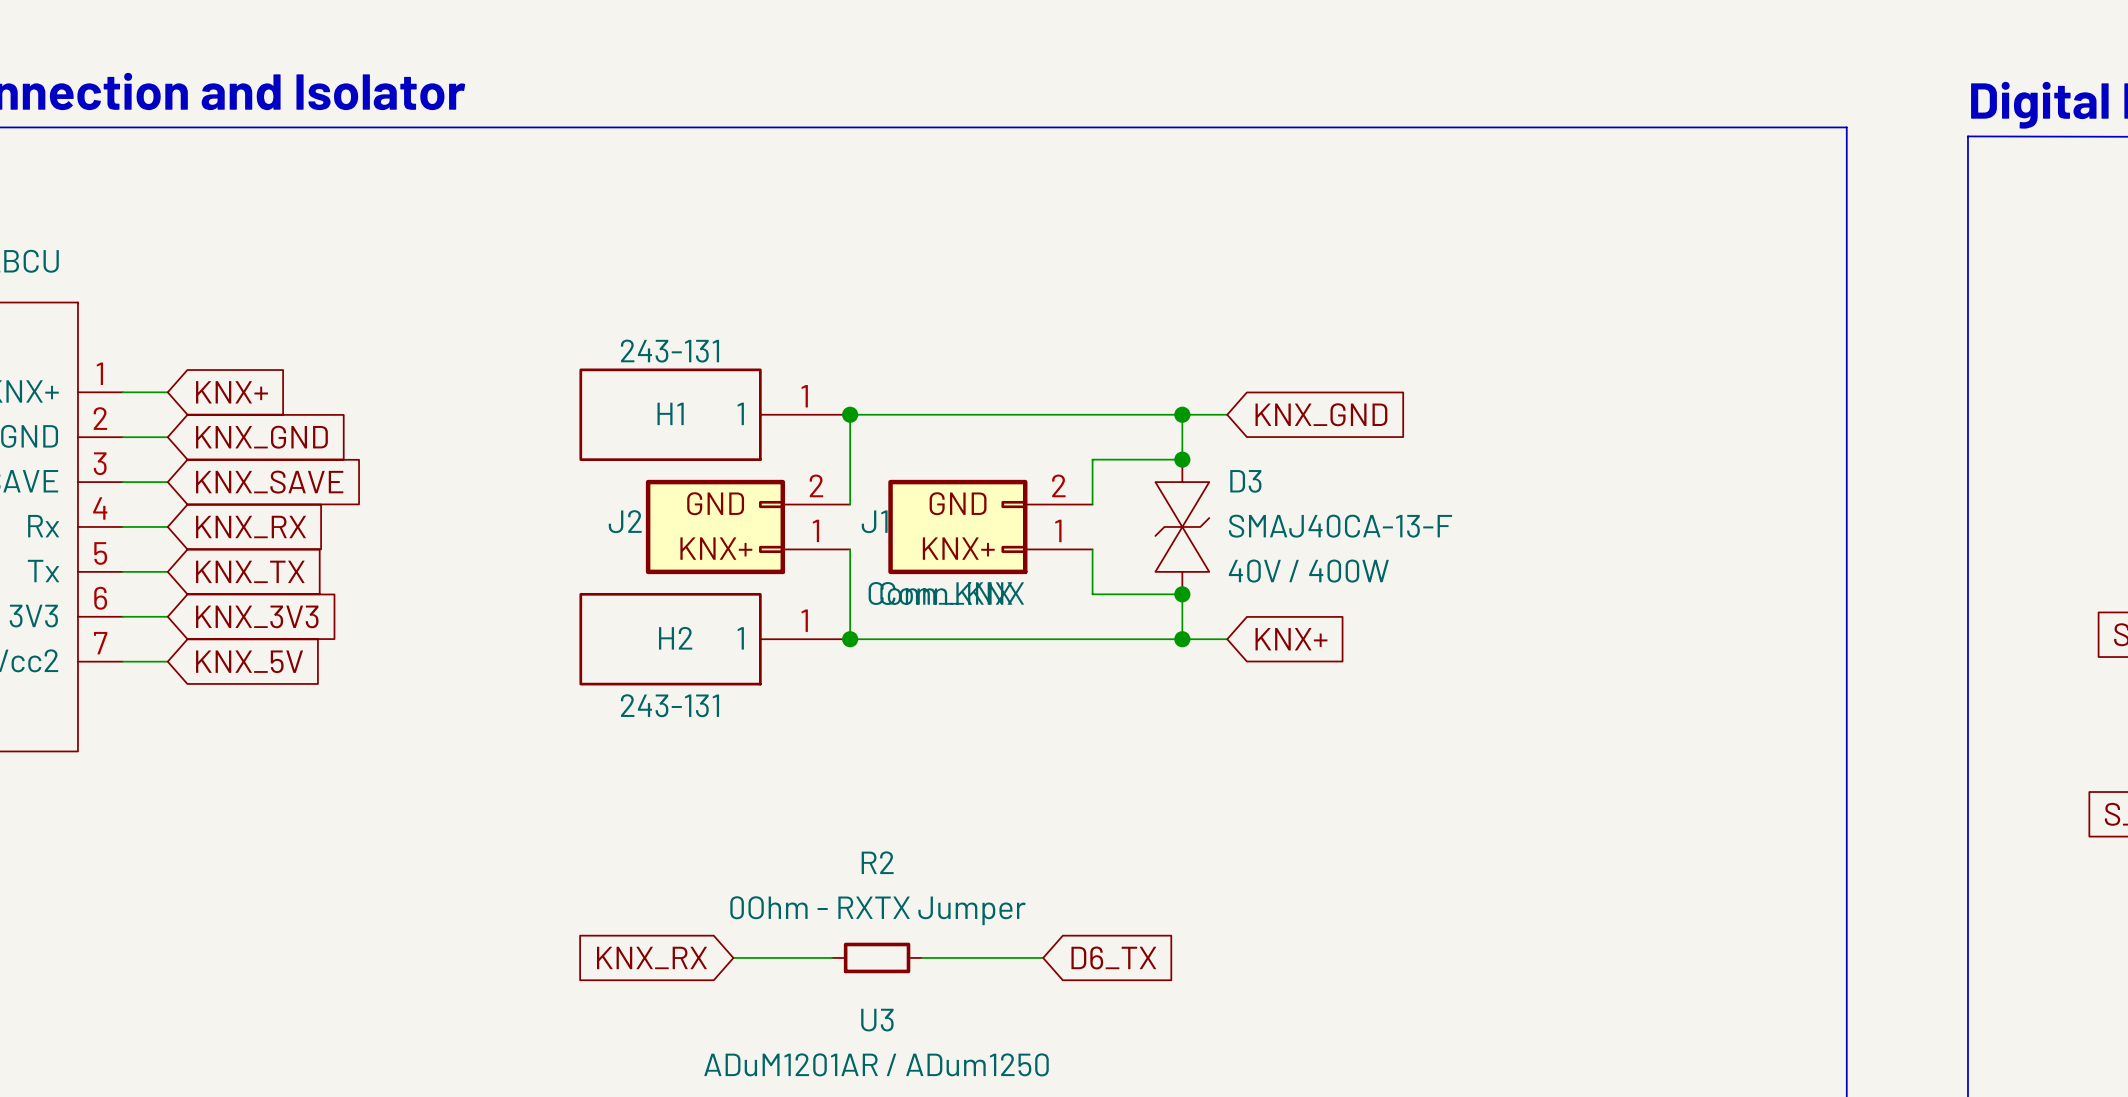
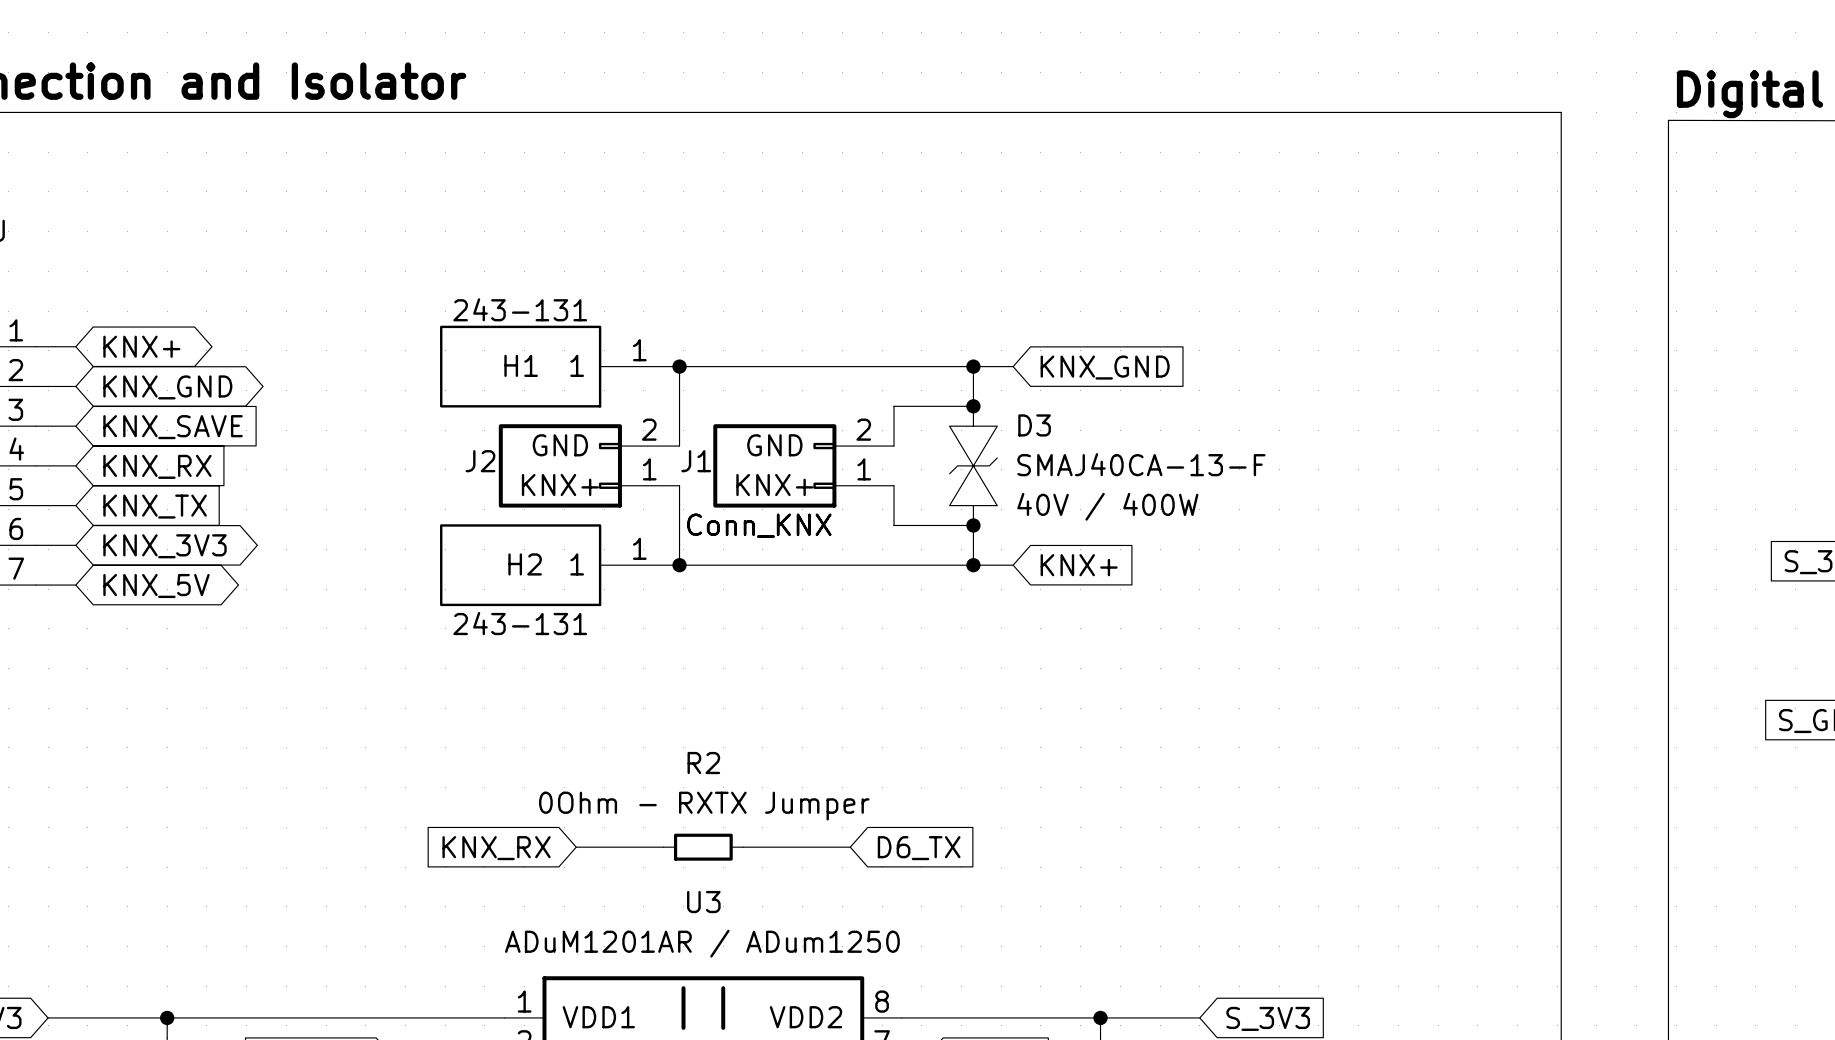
global label shape: input (231, 392) -> bidirectional (141, 346)
global label shape: input (261, 437) -> bidirectional (167, 387)
global label shape: input (257, 616) -> bidirectional (165, 546)
global label shape: input (249, 661) -> bidirectional (156, 585)

